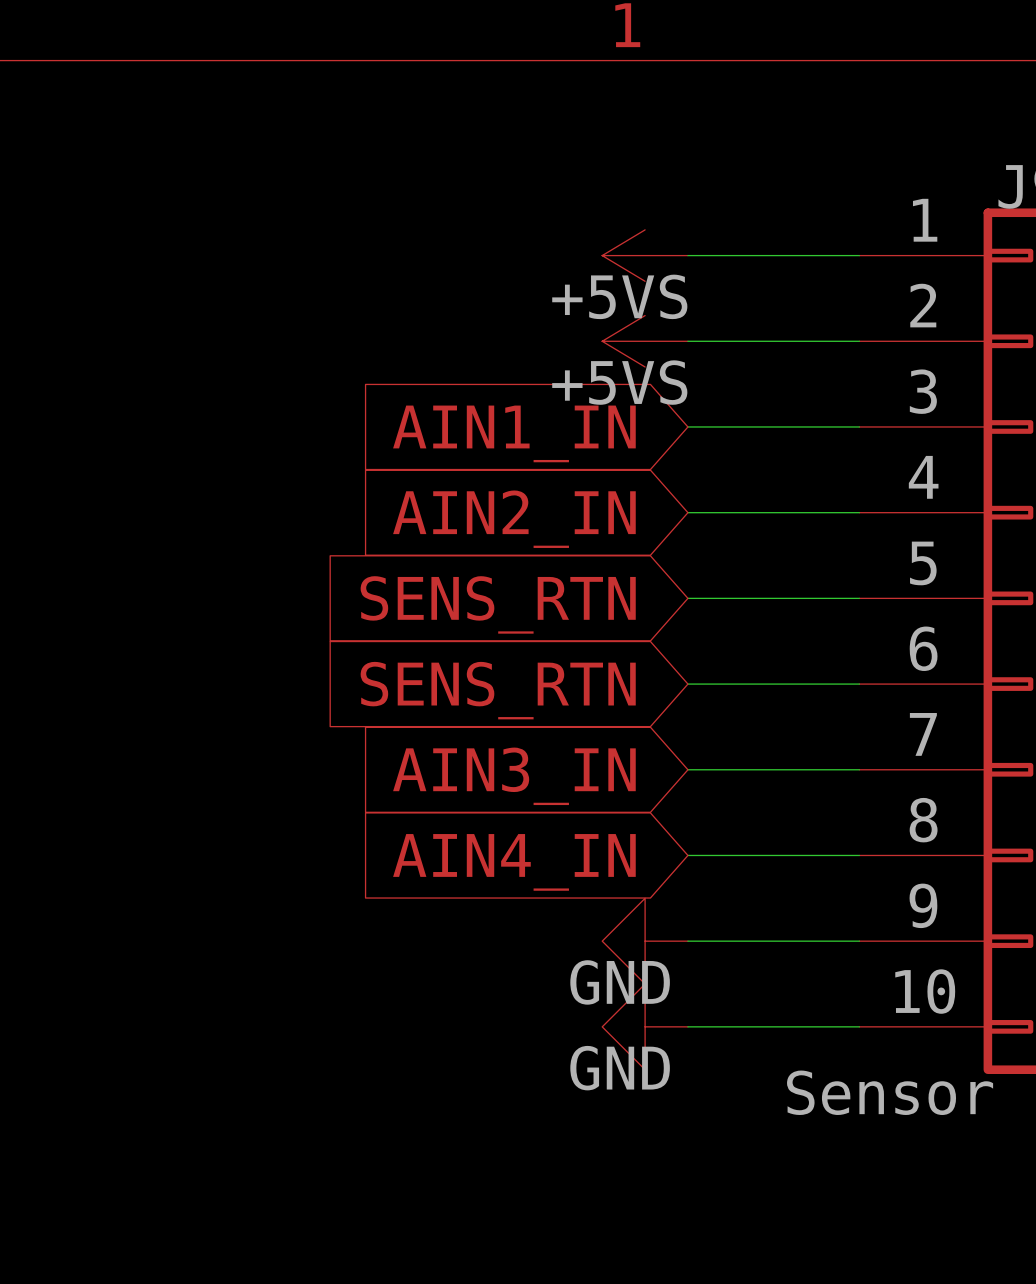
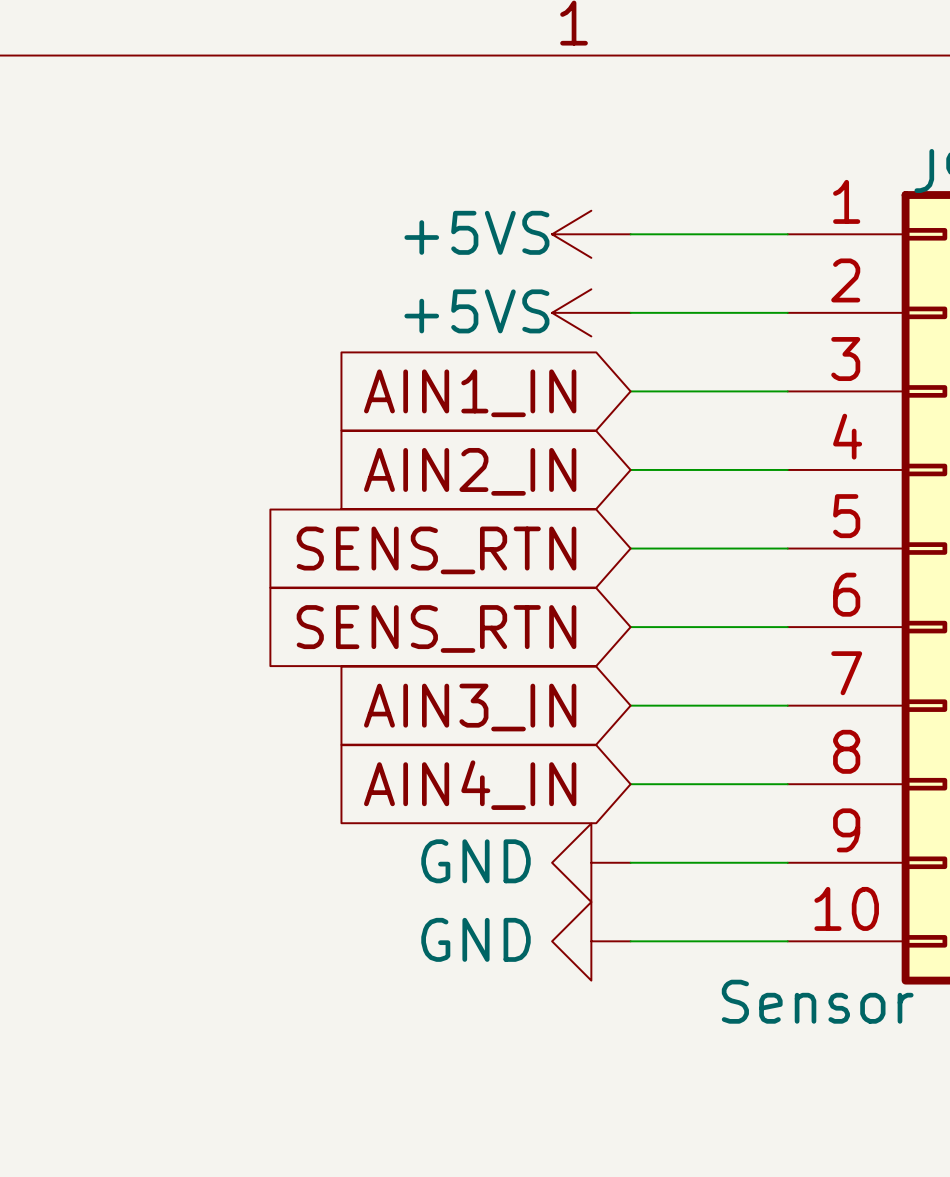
power symbol text position: +5VS (619, 296) -> +5VS (476, 232)
power symbol text position: +5VS (619, 382) -> +5VS (476, 311)
power symbol text position: GND (620, 982) -> GND (475, 861)
power symbol text position: GND (620, 1068) -> GND (475, 939)

